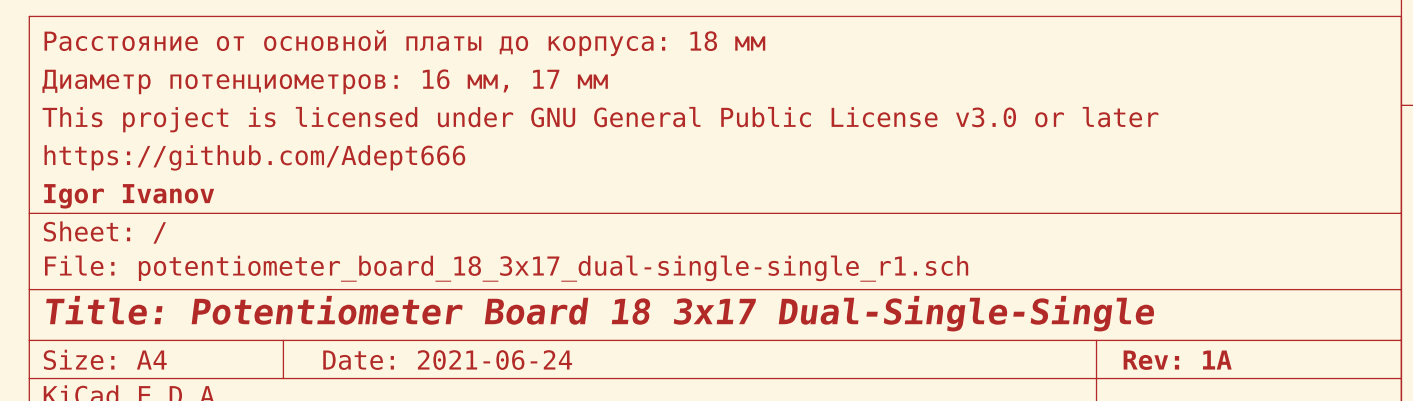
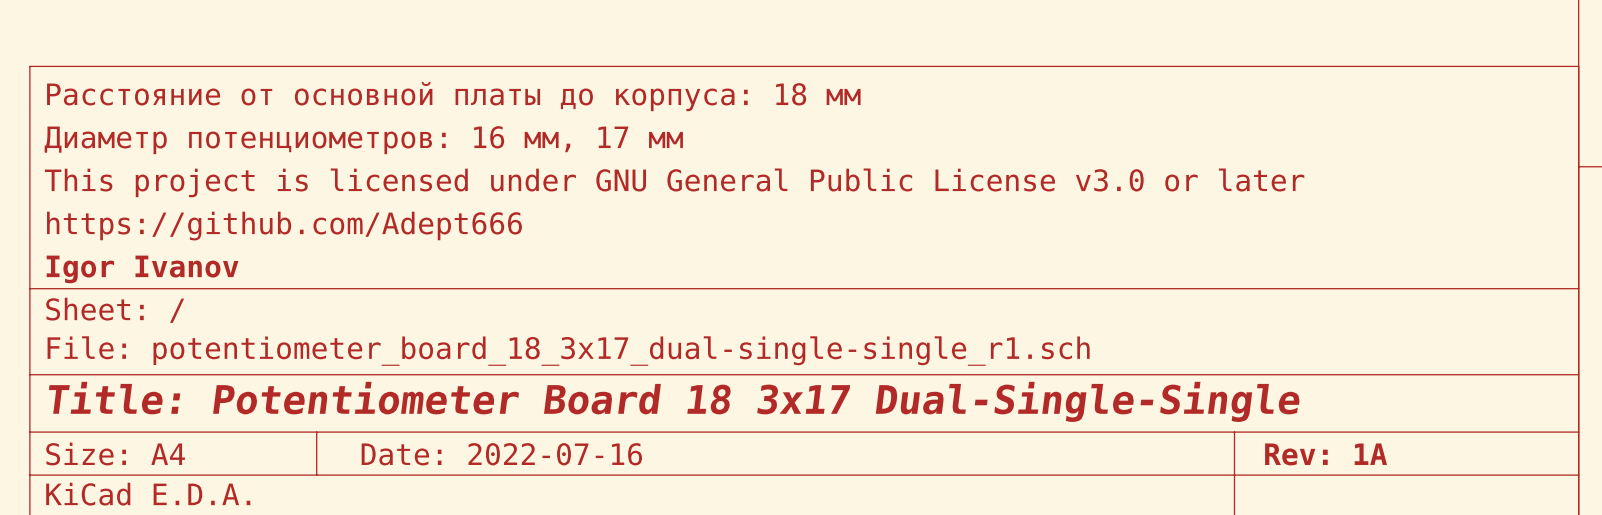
title block: Date: 2021-06-24 (447, 360) -> Date: 2022-07-16 (501, 454)

